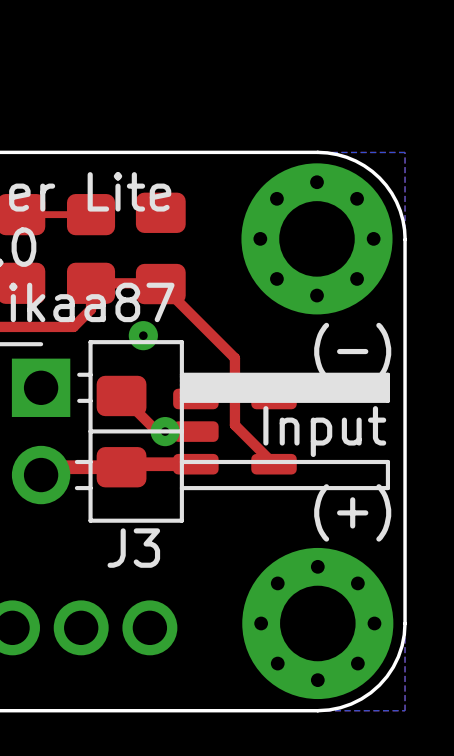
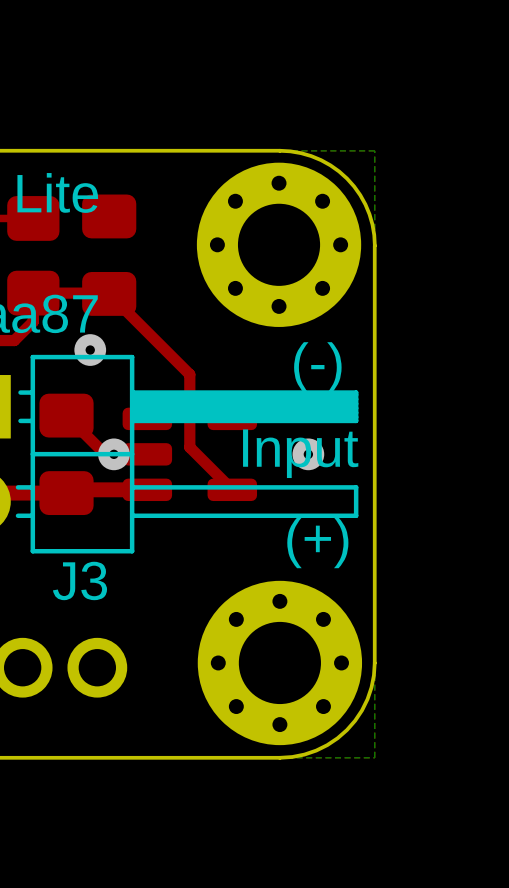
via: none -> (308, 454)

